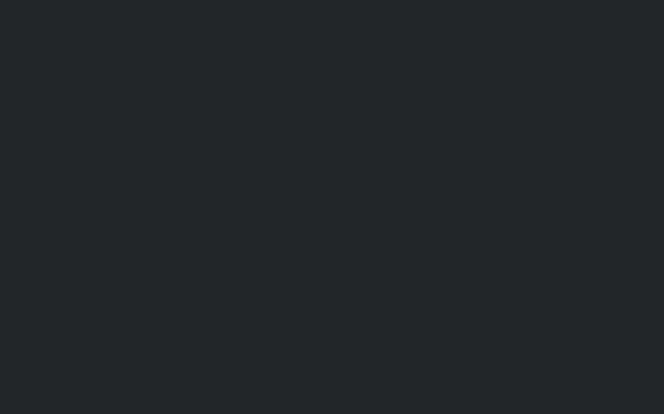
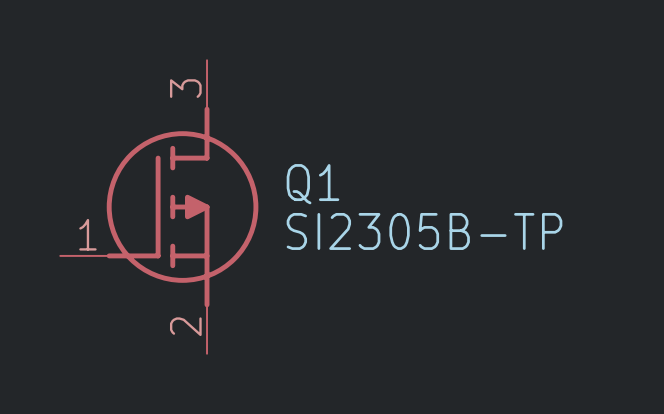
Q1: none -> SI2305B-TP (159, 207)

